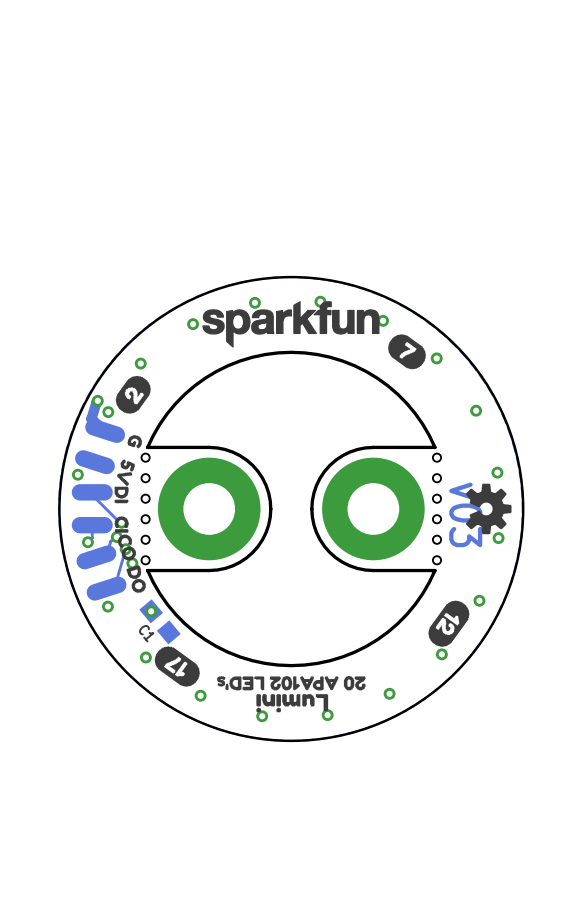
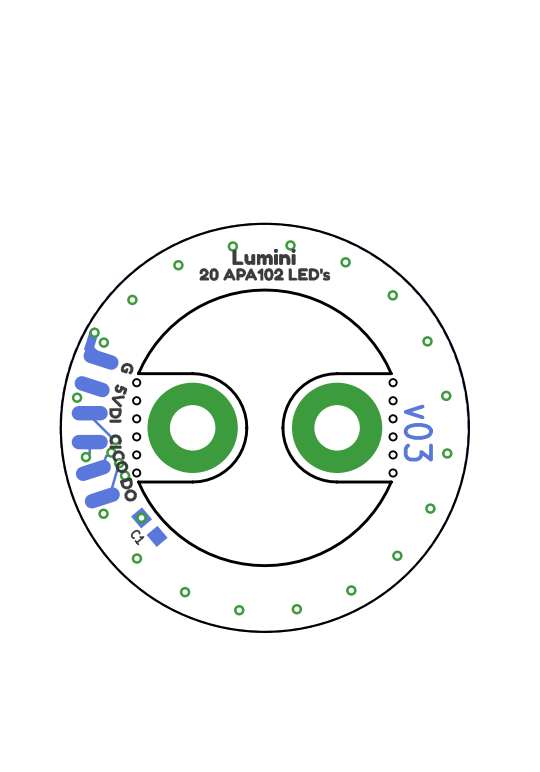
drawing: [202, 301, 427, 370] -> none
drawing: none -> [199, 248, 331, 281]
drawing: [115, 375, 152, 414] -> none
drawing: [465, 483, 512, 535] -> none
drawing: [428, 600, 470, 648] -> none
drawing: [154, 646, 366, 713] -> none

